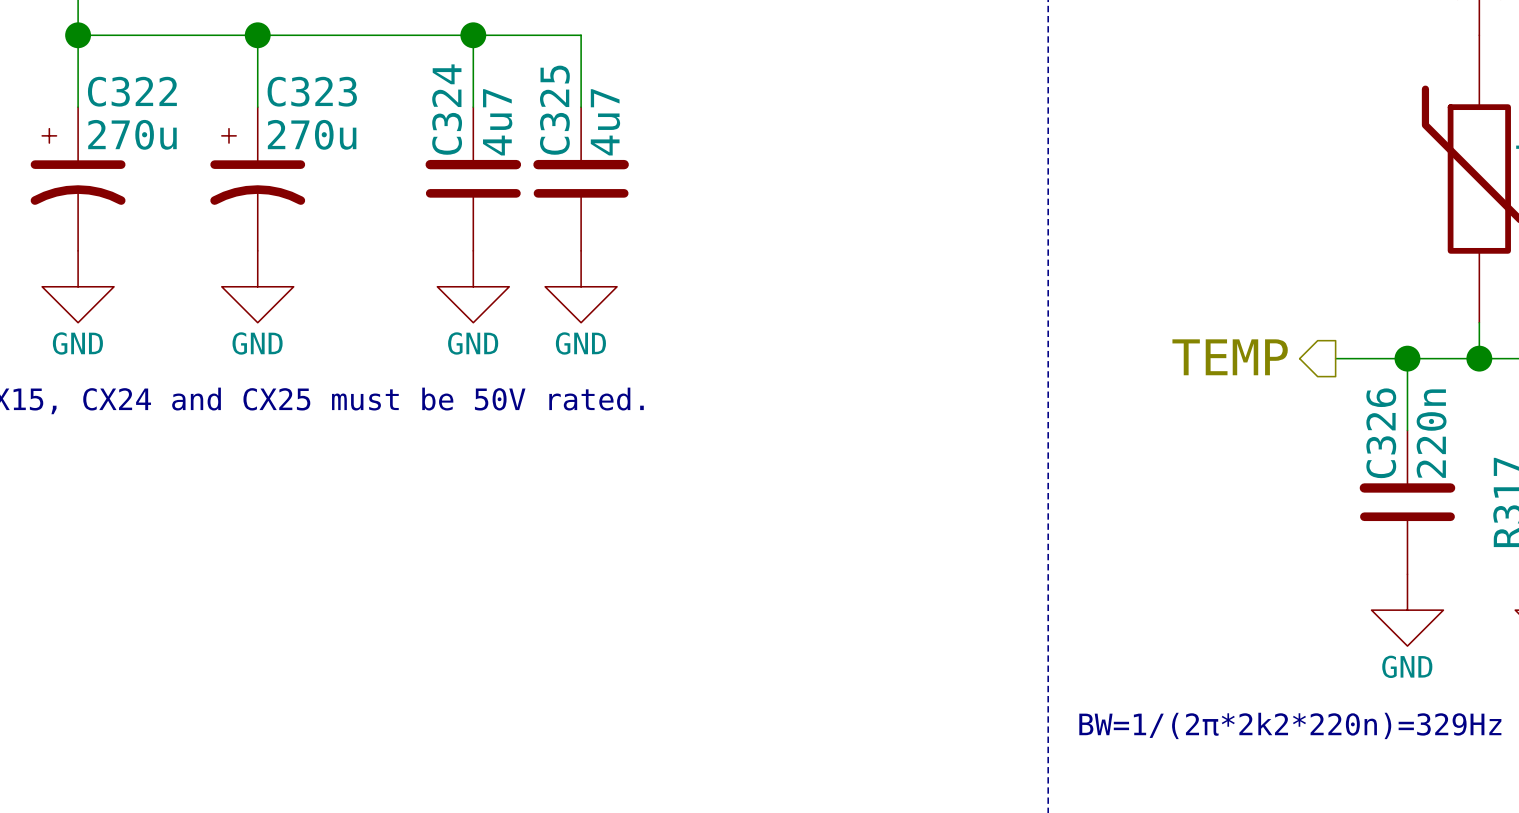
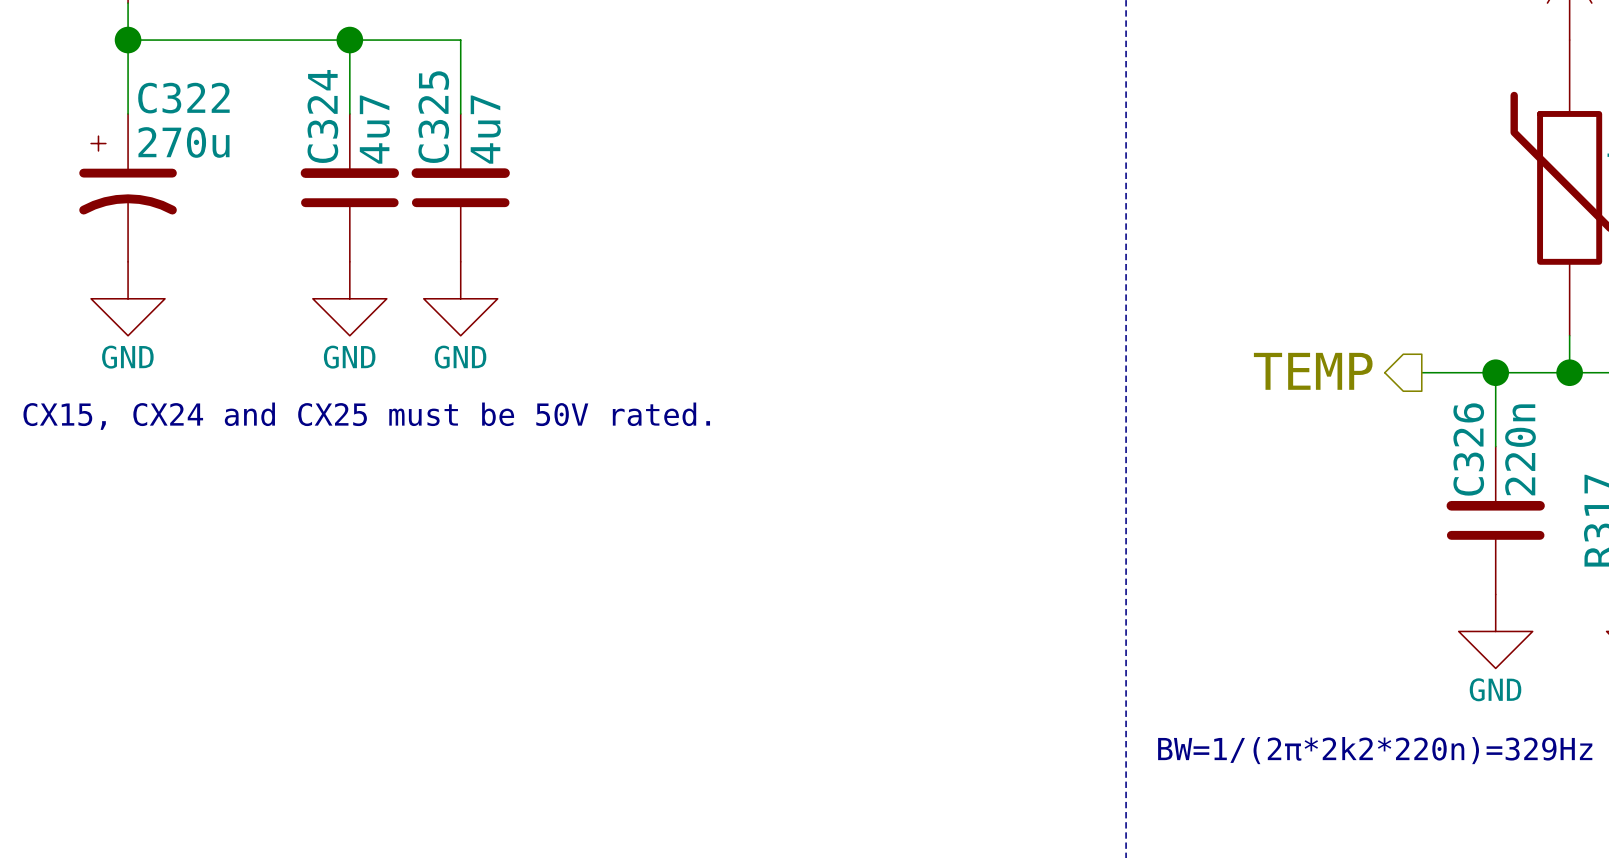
wire: (257, 35) (257, 107) -> (349, 40) (349, 113)
junction position: (257, 35) -> (349, 40)
wire: (401, 35) (581, 35) (581, 107) -> (460, 40) (460, 113)
wire: (473, 35) (473, 107) -> none
junction: (473, 35) -> none
C323: 270u (257, 178) -> none
C324 position: (473, 178) -> (349, 187)
C325 position: (581, 178) -> (460, 187)
power symbol position: GND (257, 286) -> GND (349, 298)
power symbol: none -> GND (460, 298)
power symbol: GND (473, 286) -> none
power symbol: GND (581, 286) -> none

